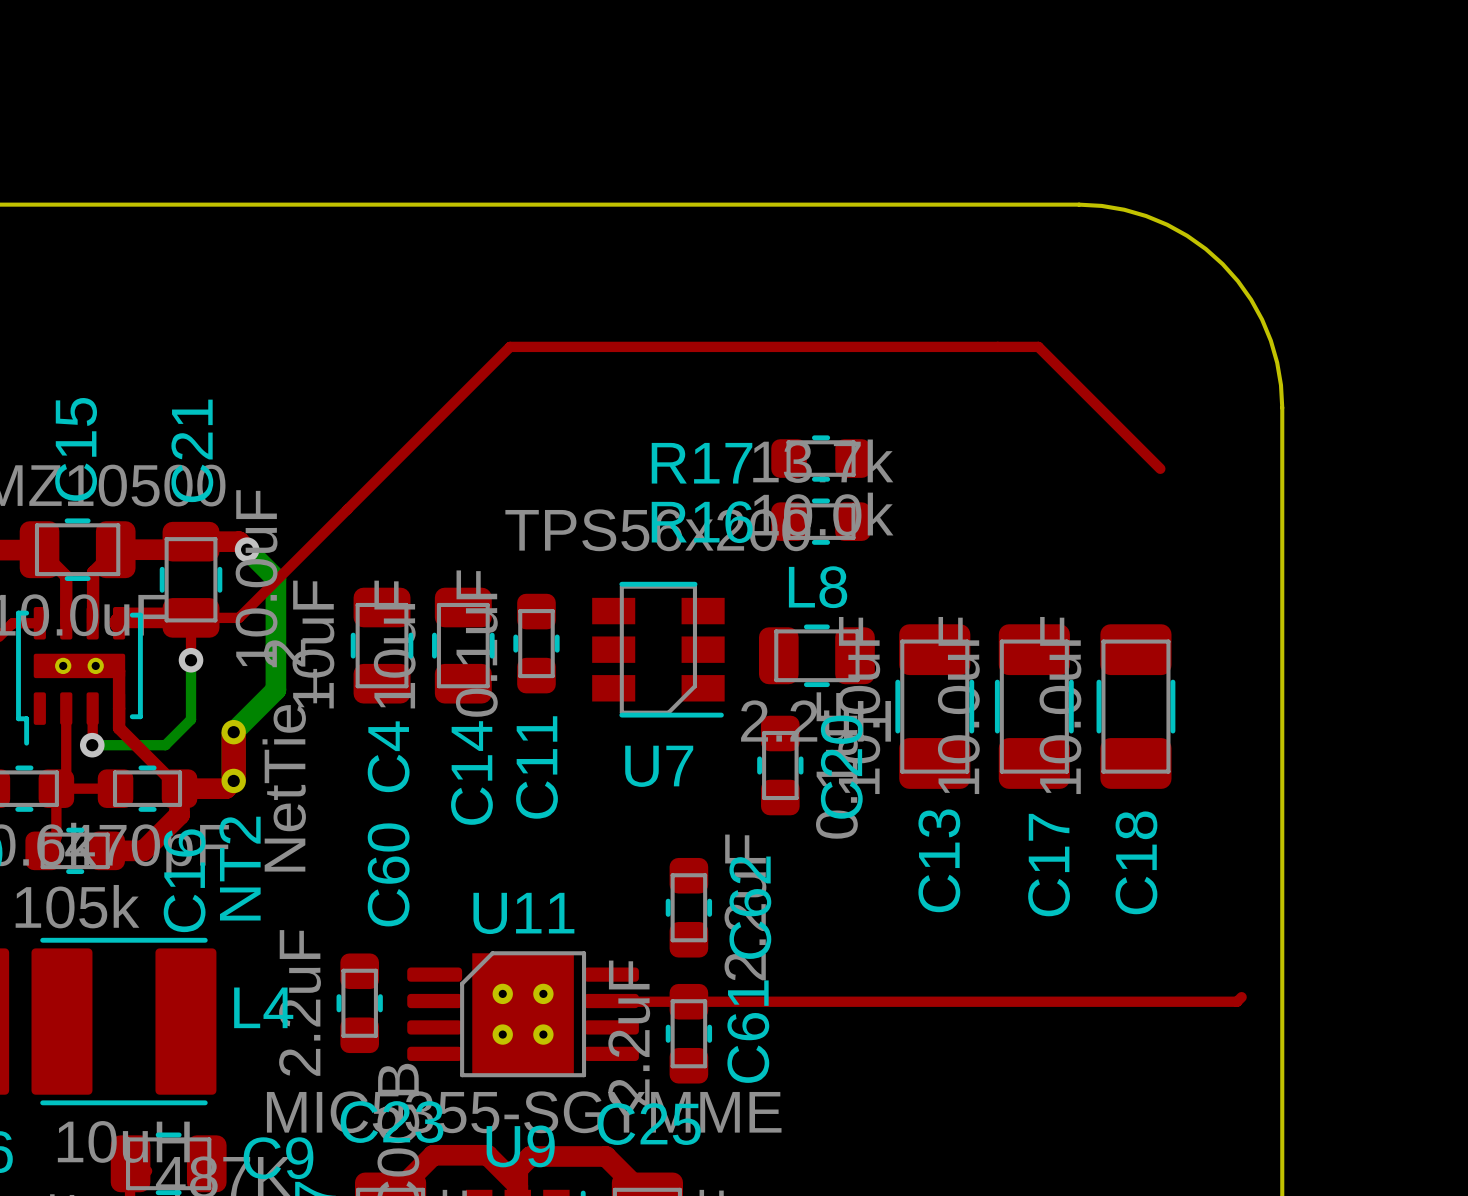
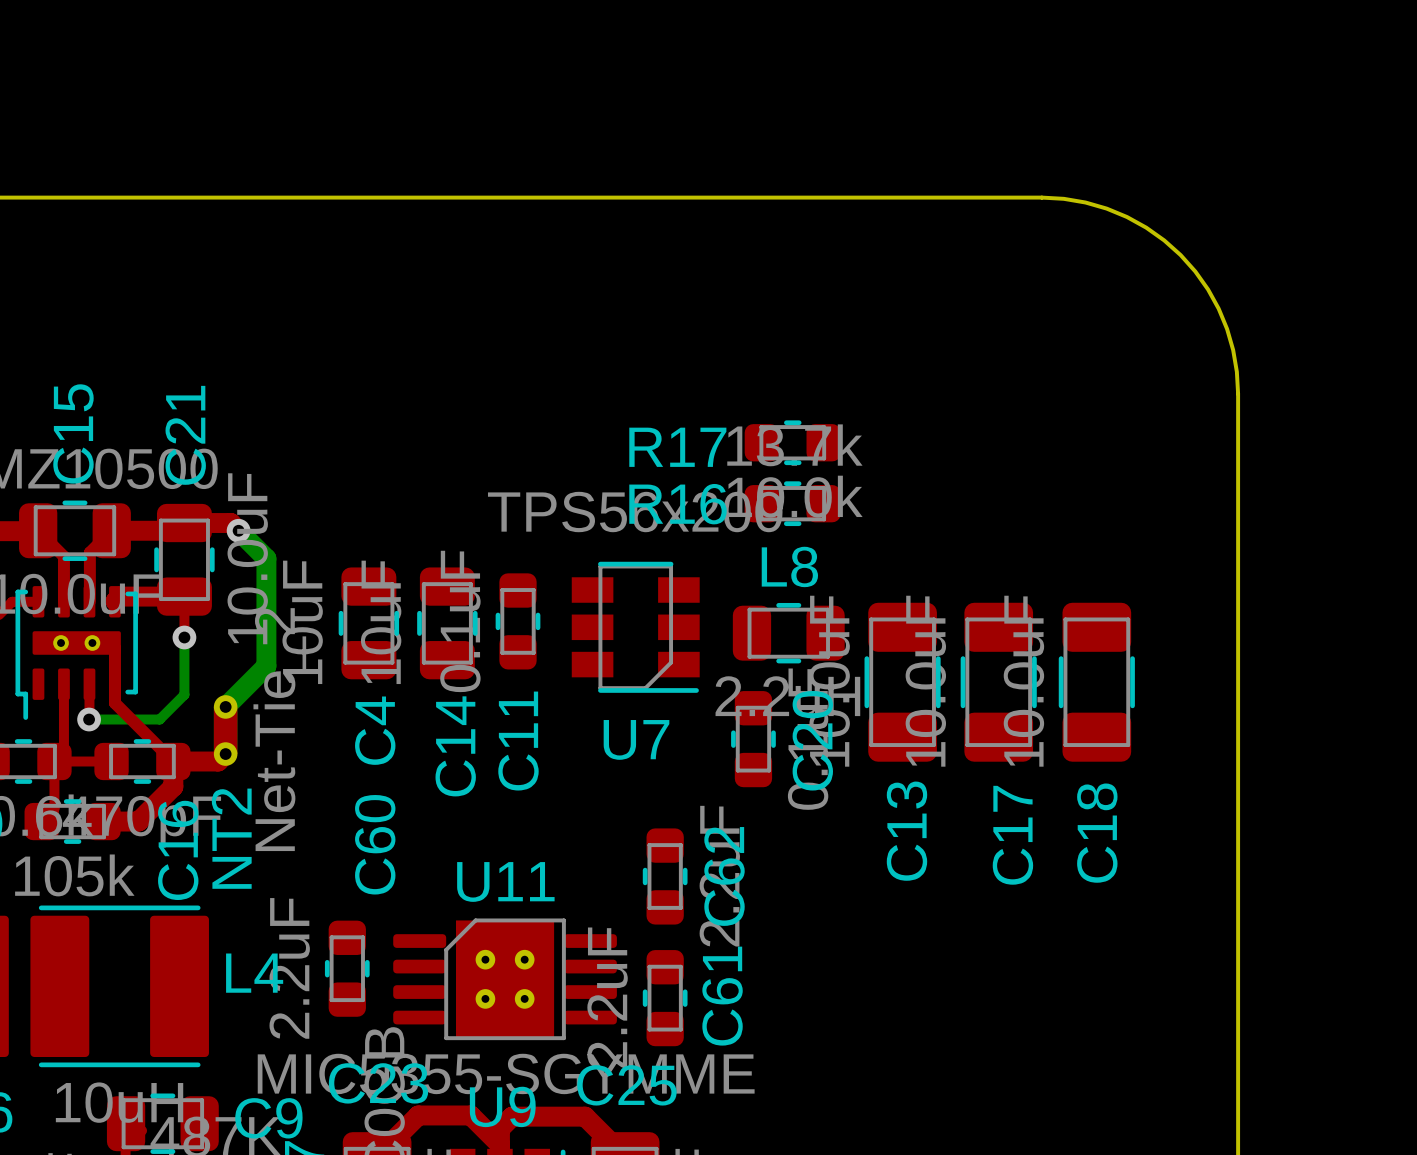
top track: (1160, 468) (1038, 346) (510, 346) (239, 617) (191, 617) -> none
NT2 value: NetTie_2 (289, 755) -> Net-Tie_2 (279, 729)
top track: (1241, 997) (1237, 1001) (611, 1001) -> none

